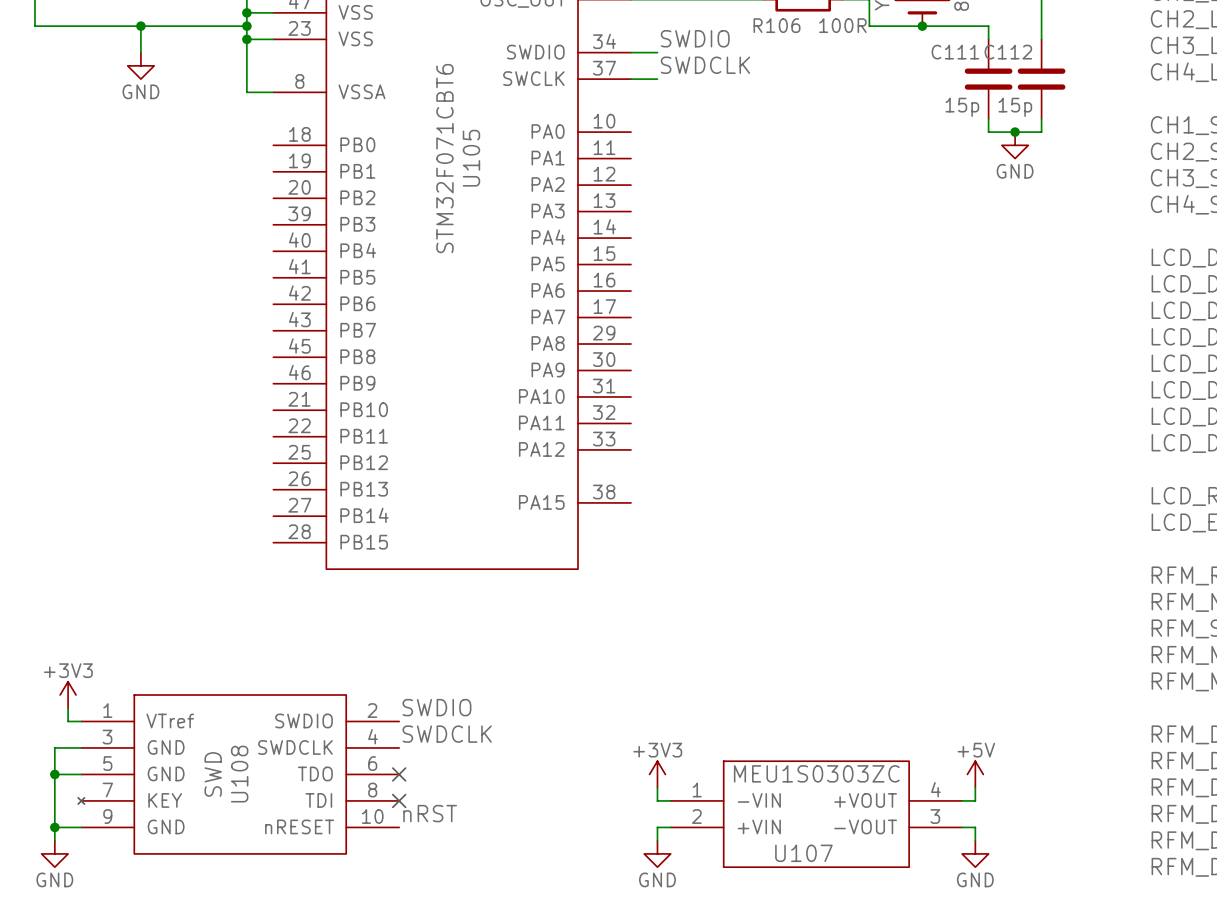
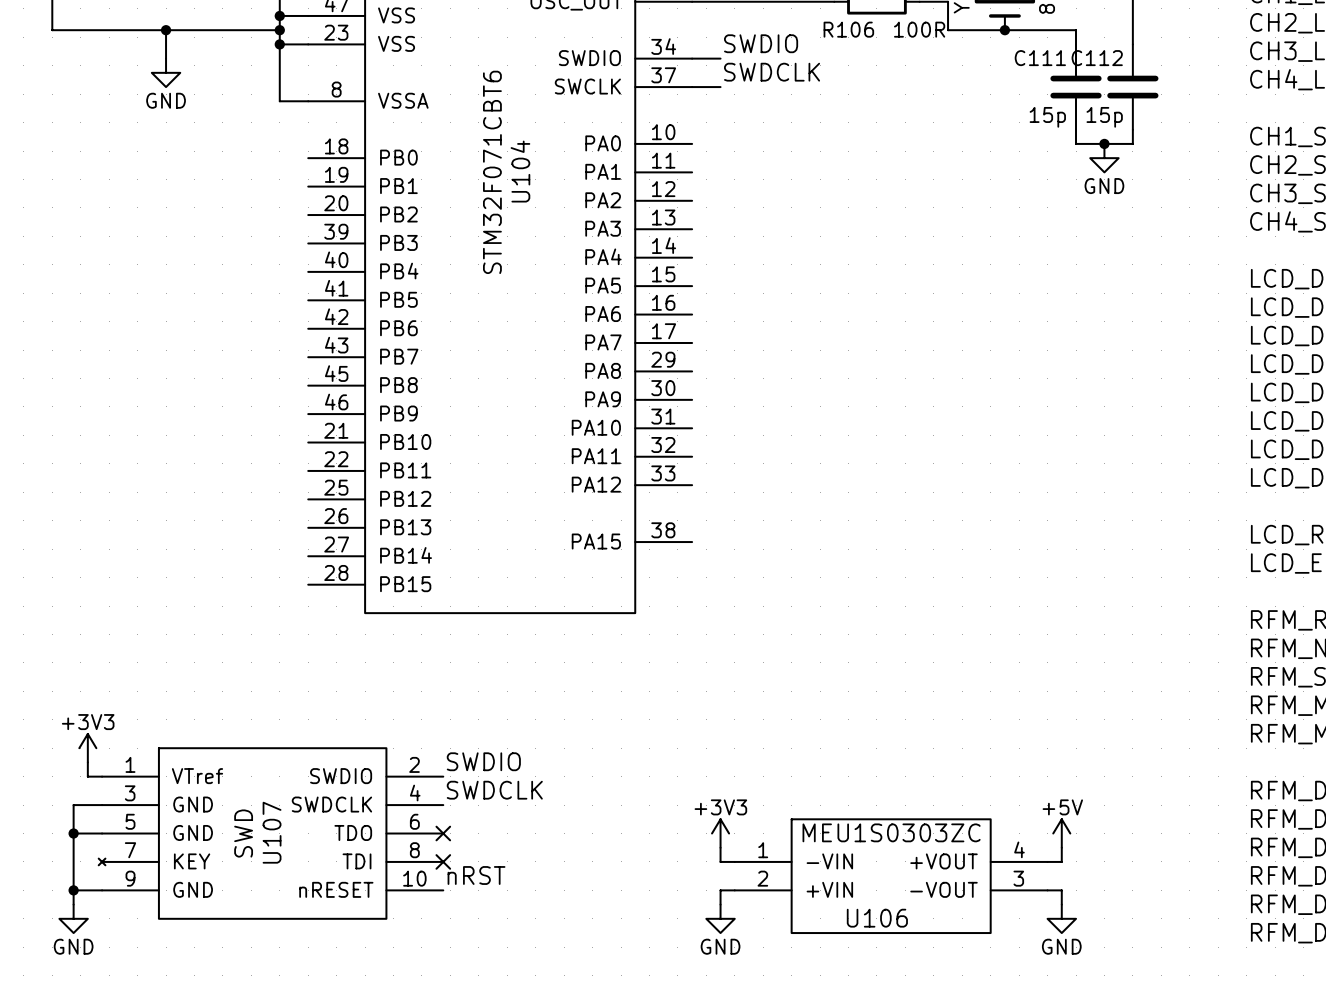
U105 name: U105 (471, 158) -> U104 (520, 171)
U108 name: U108 (239, 774) -> U107 (272, 832)
U107 name: U107 (803, 853) -> U106 (877, 918)

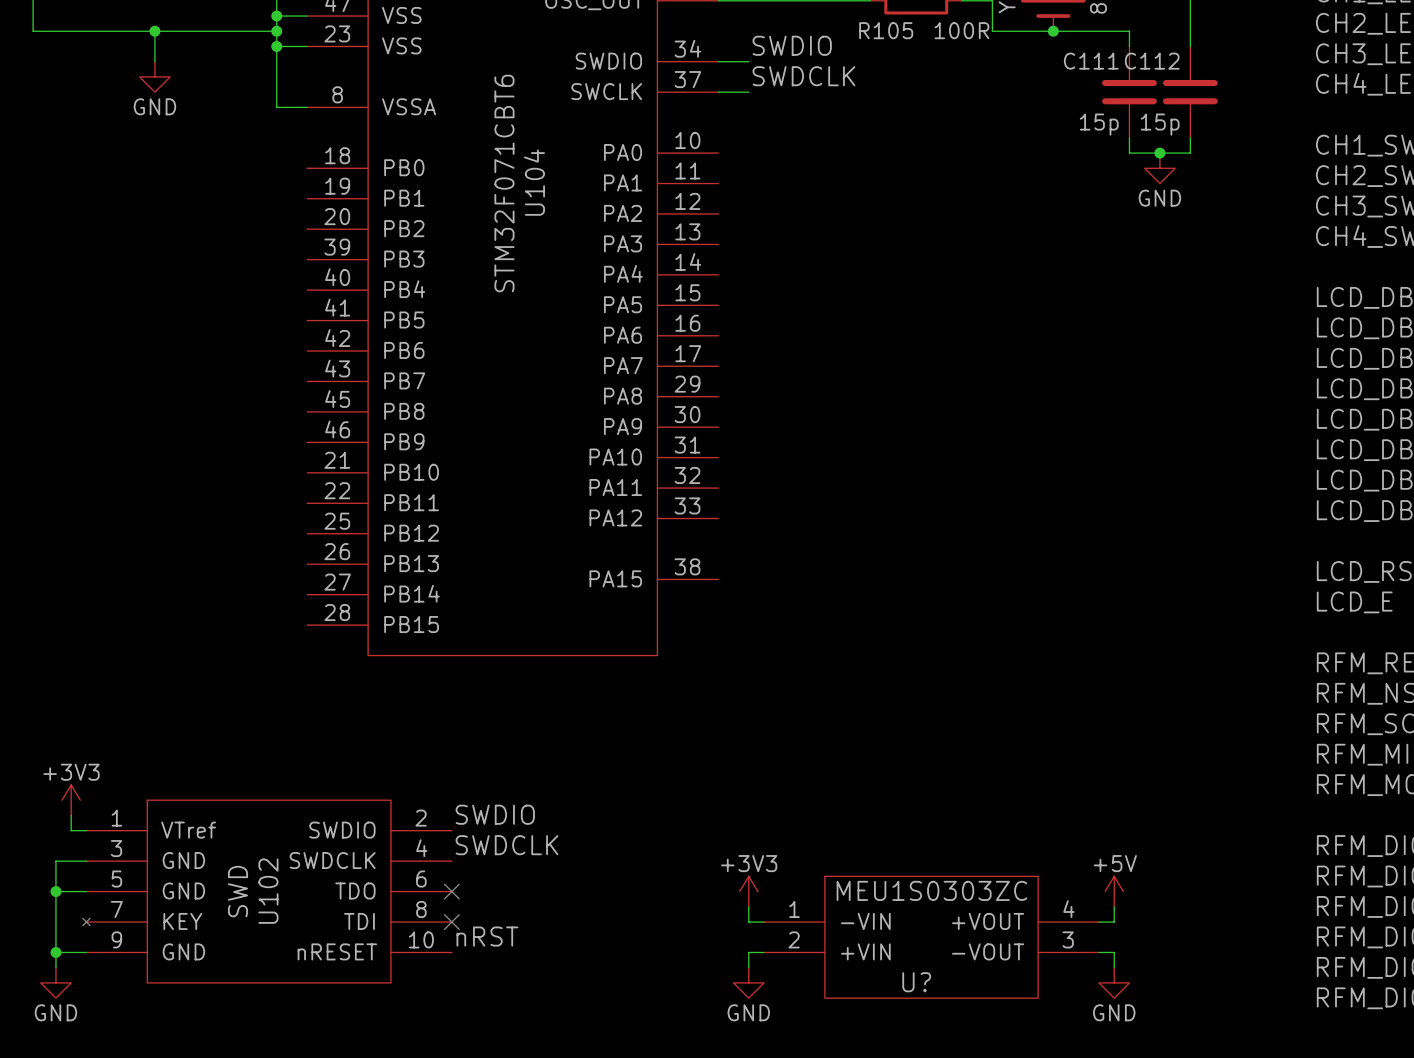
R106 name: R106 (848, 29) -> R105 (886, 30)
U107 name: U107 (272, 832) -> U102 (268, 891)
U106 name: U106 (877, 918) -> U? (916, 982)

